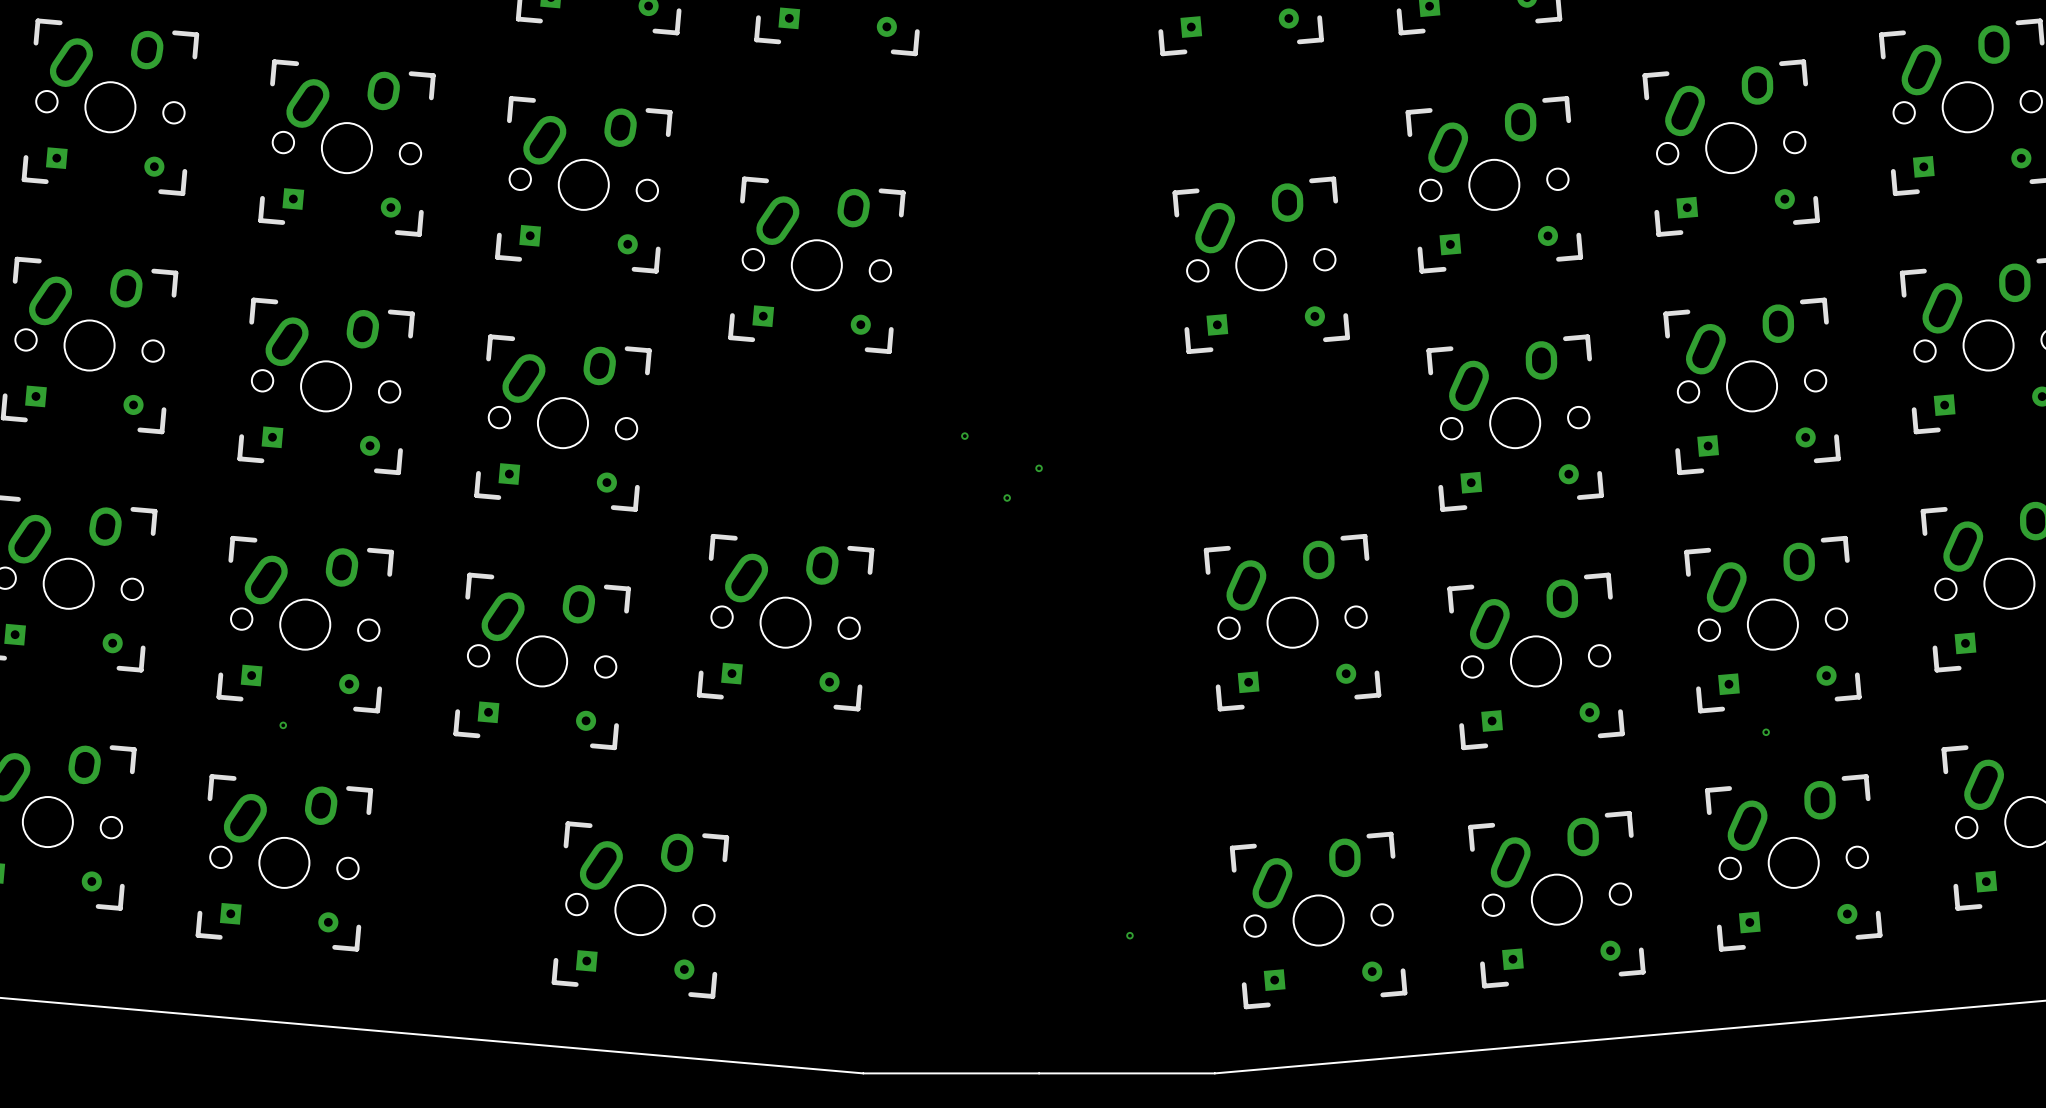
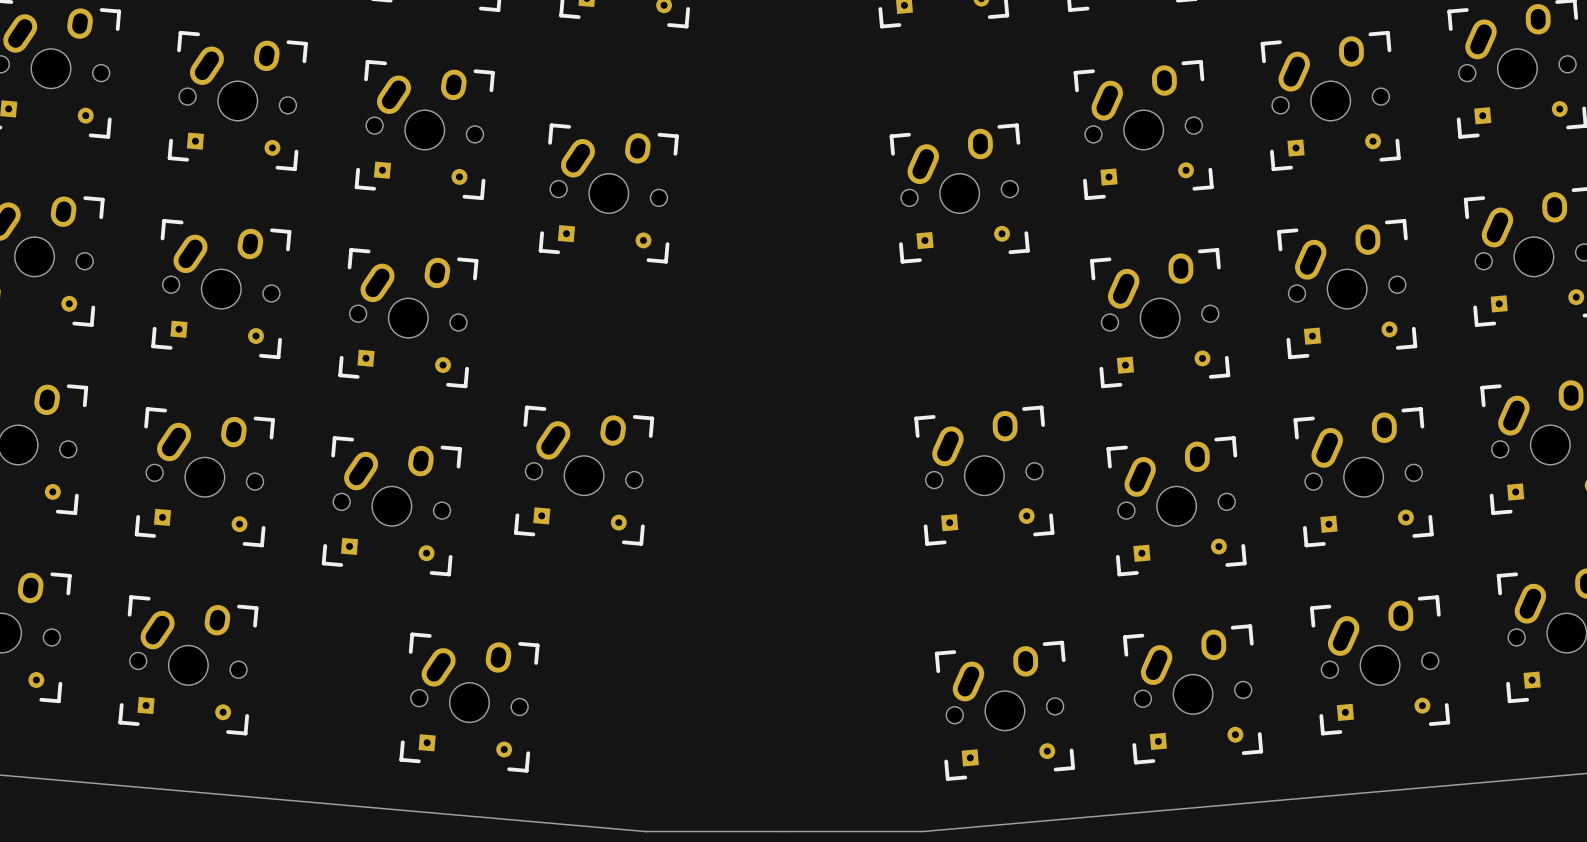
part: (964, 436) -> none
part: (1039, 468) -> none
part: (1007, 497) -> none
part: (283, 725) -> none
part: (1766, 732) -> none
part: (1129, 935) -> none

